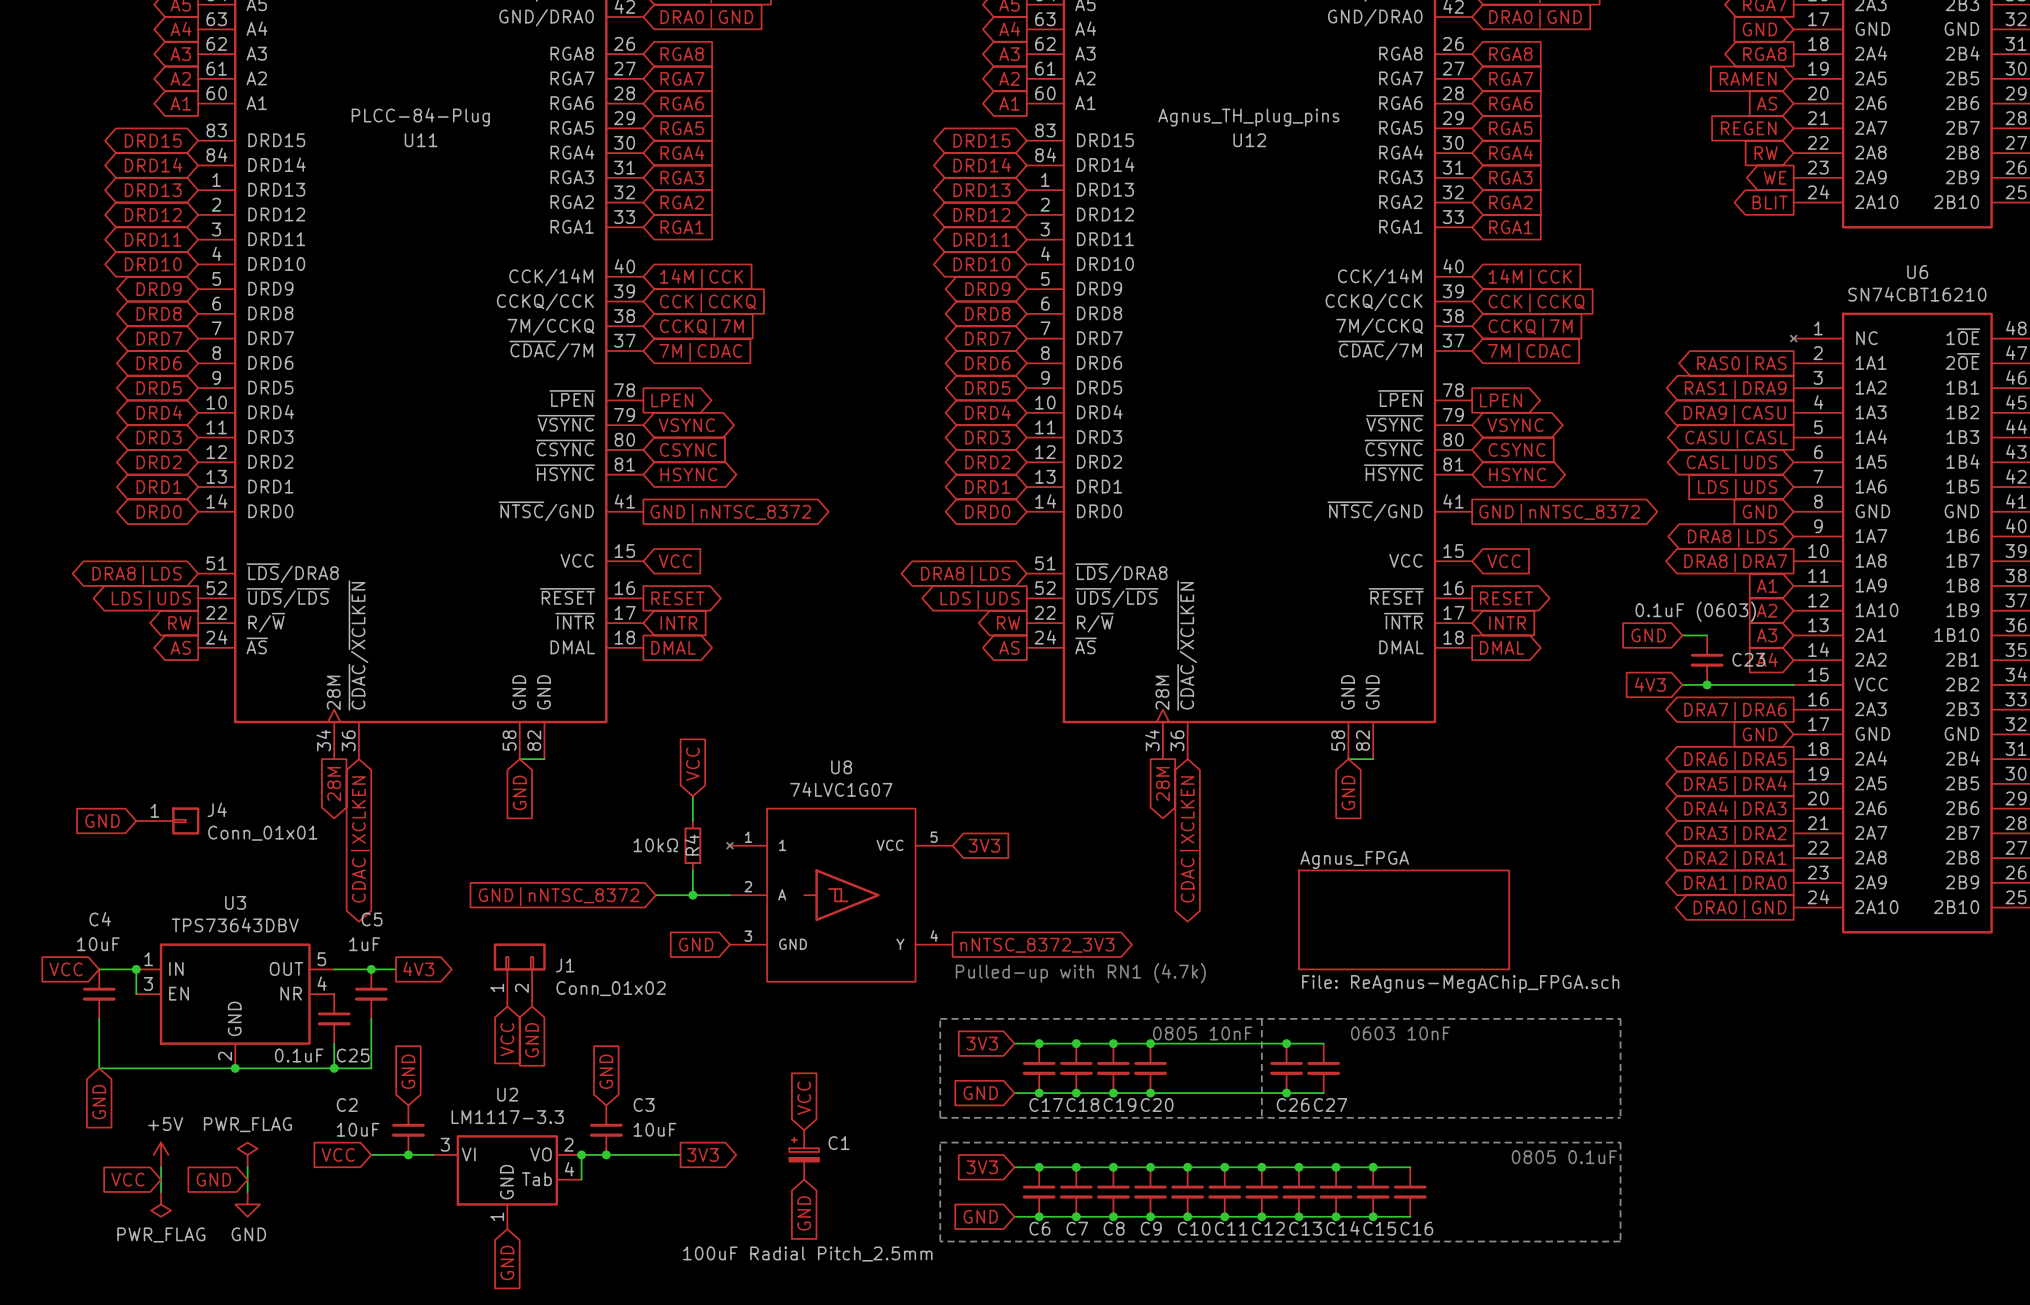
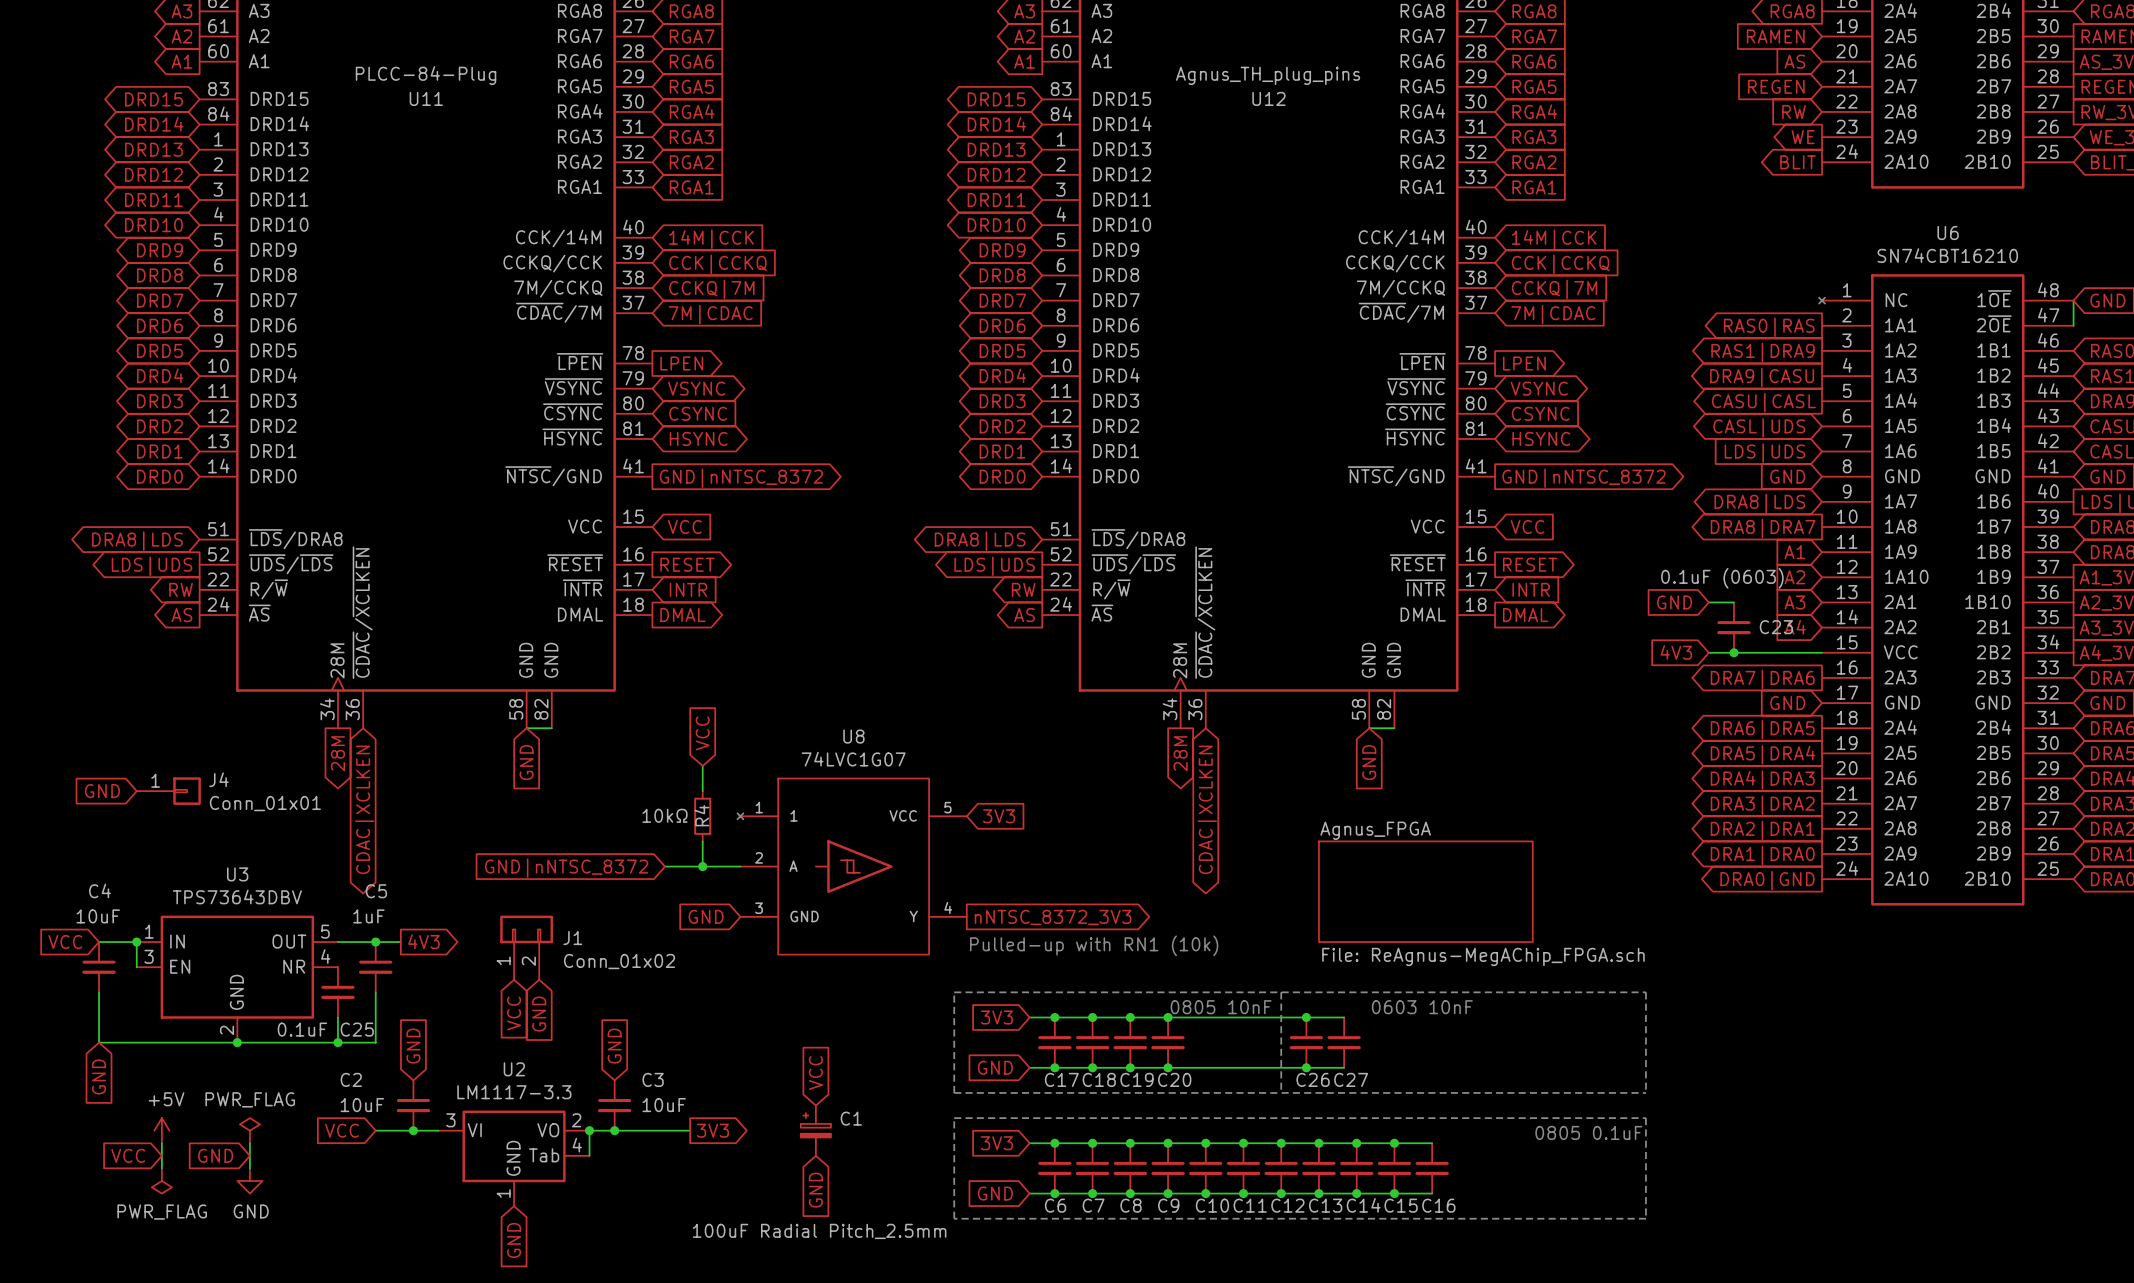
text: Pulled-up with RN1 (4.7k) (1080, 973) -> Pulled-up with RN1 (10k) (1094, 945)

